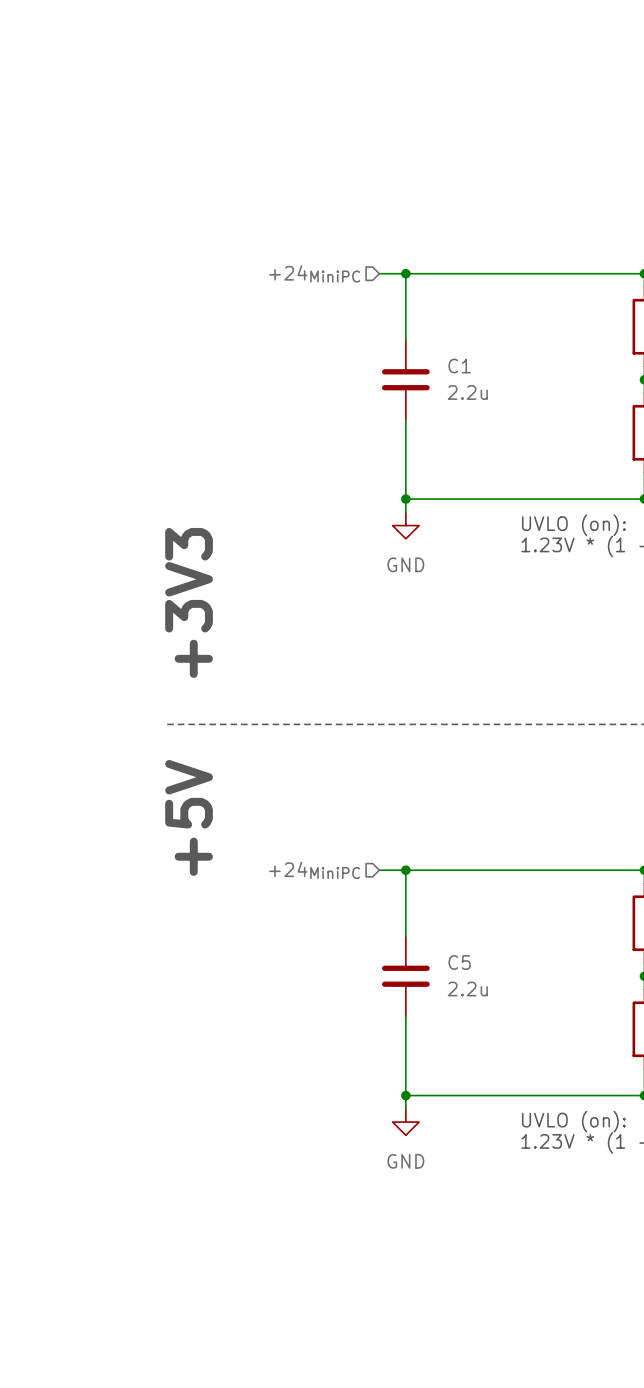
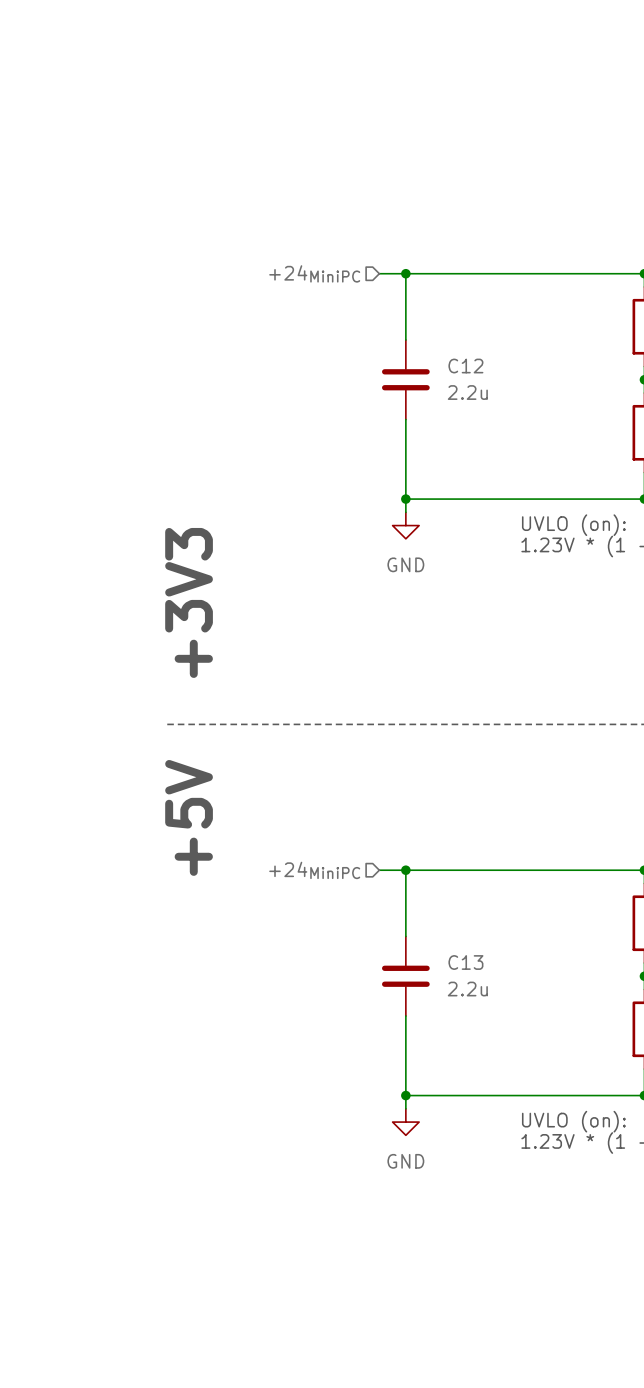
C1 name: C1 (459, 366) -> C12 (465, 366)
C5 name: C5 (459, 962) -> C13 (465, 962)

